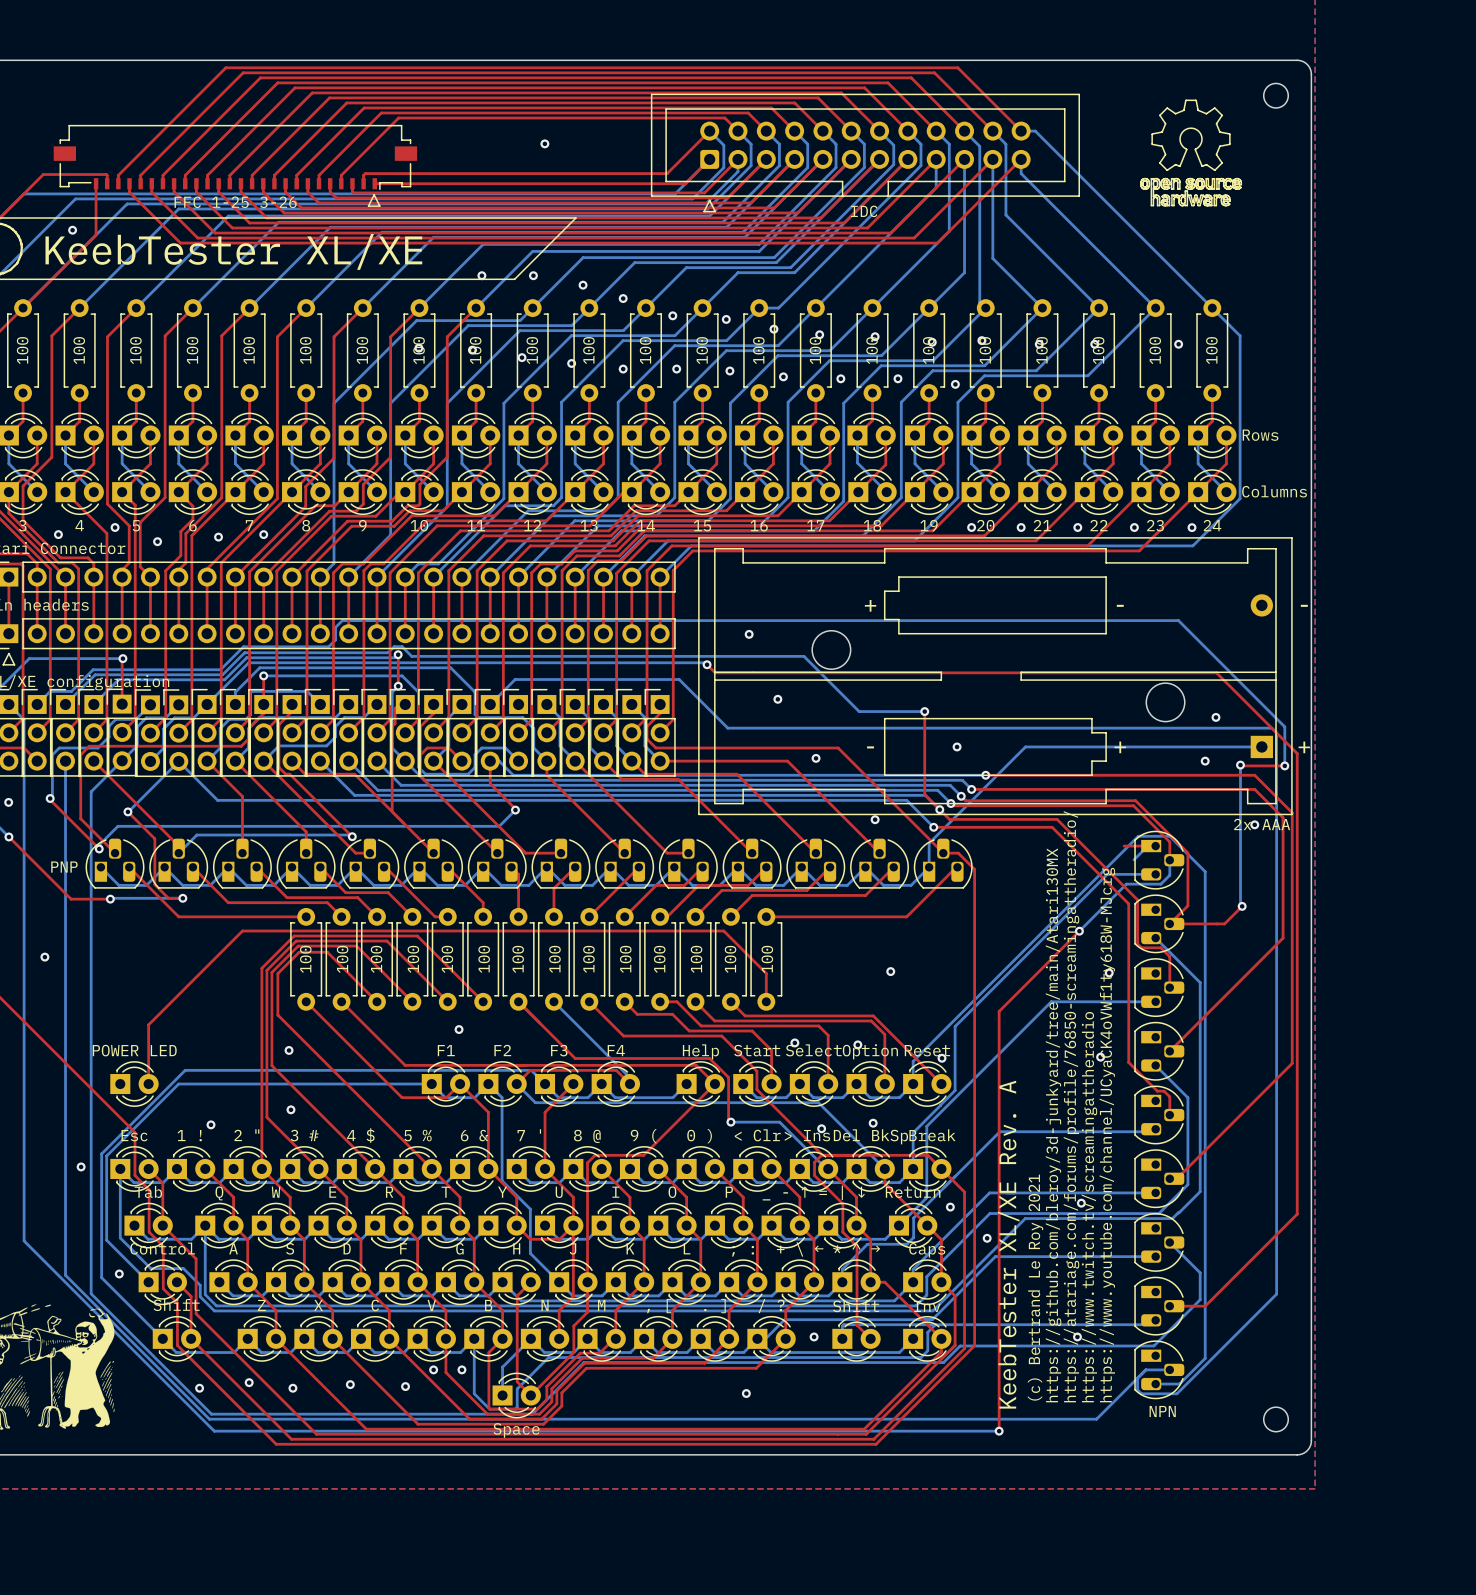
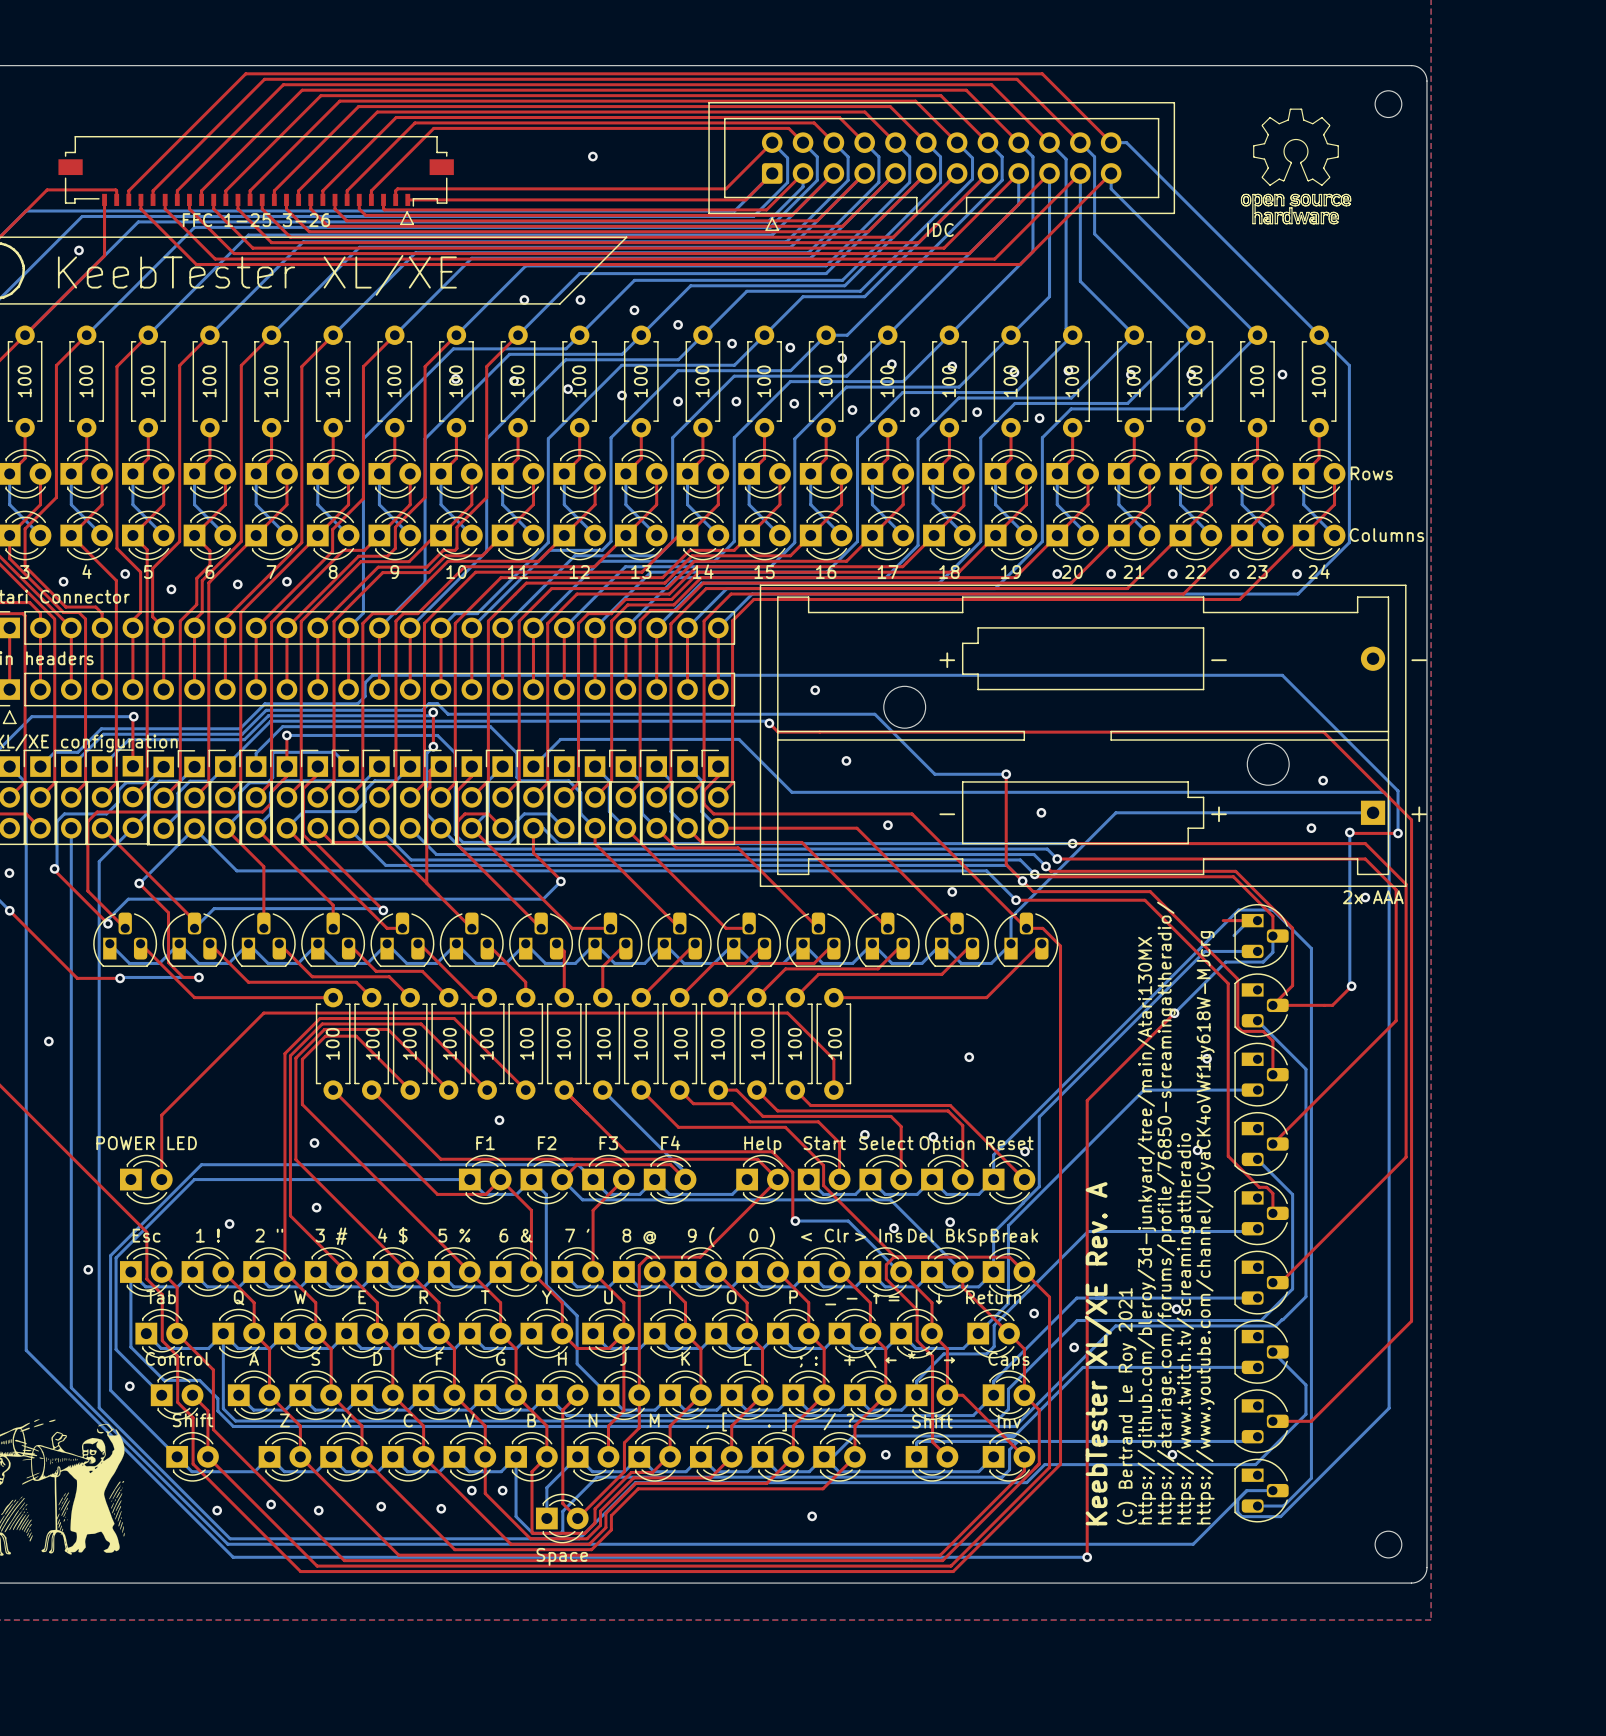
text: PNP (64, 867) -> none
text: NPN (1162, 1411) -> none

